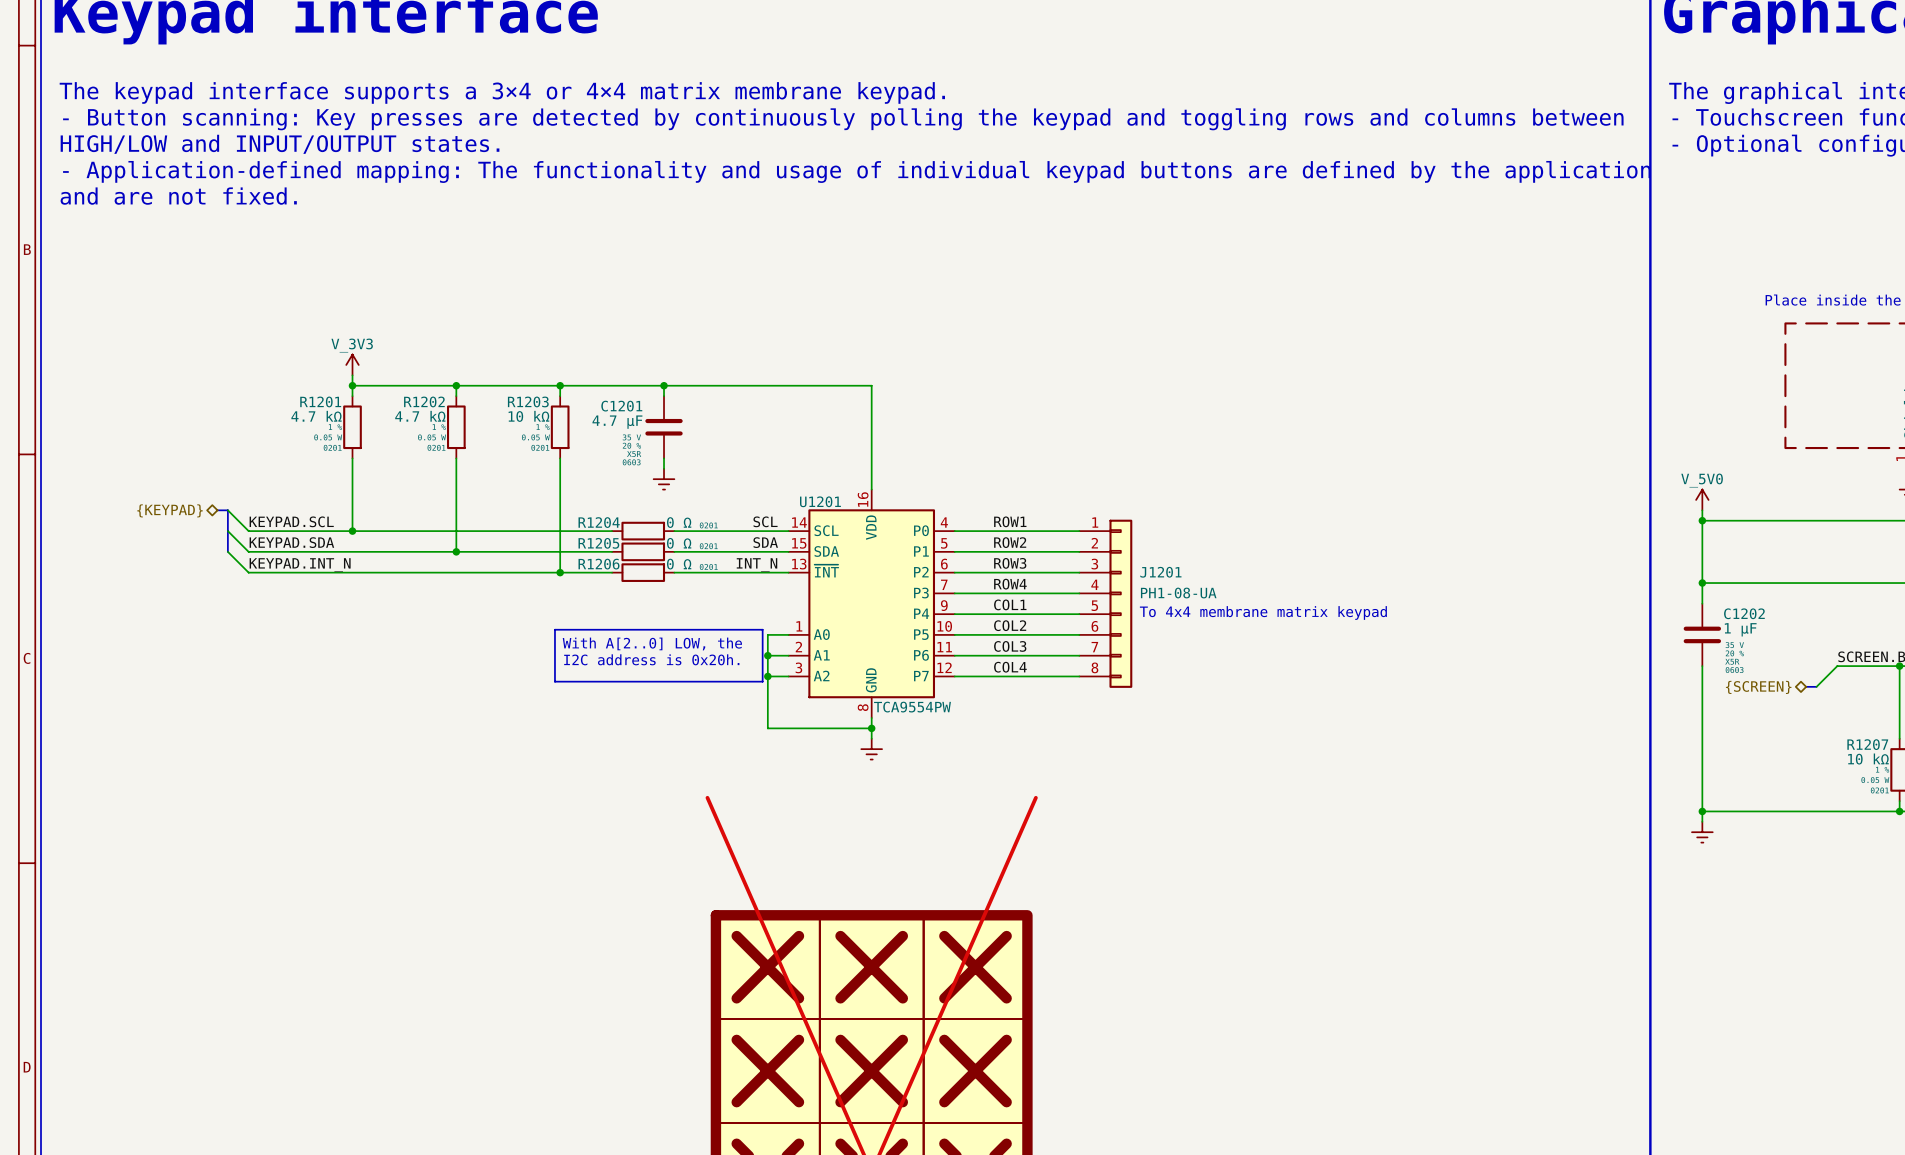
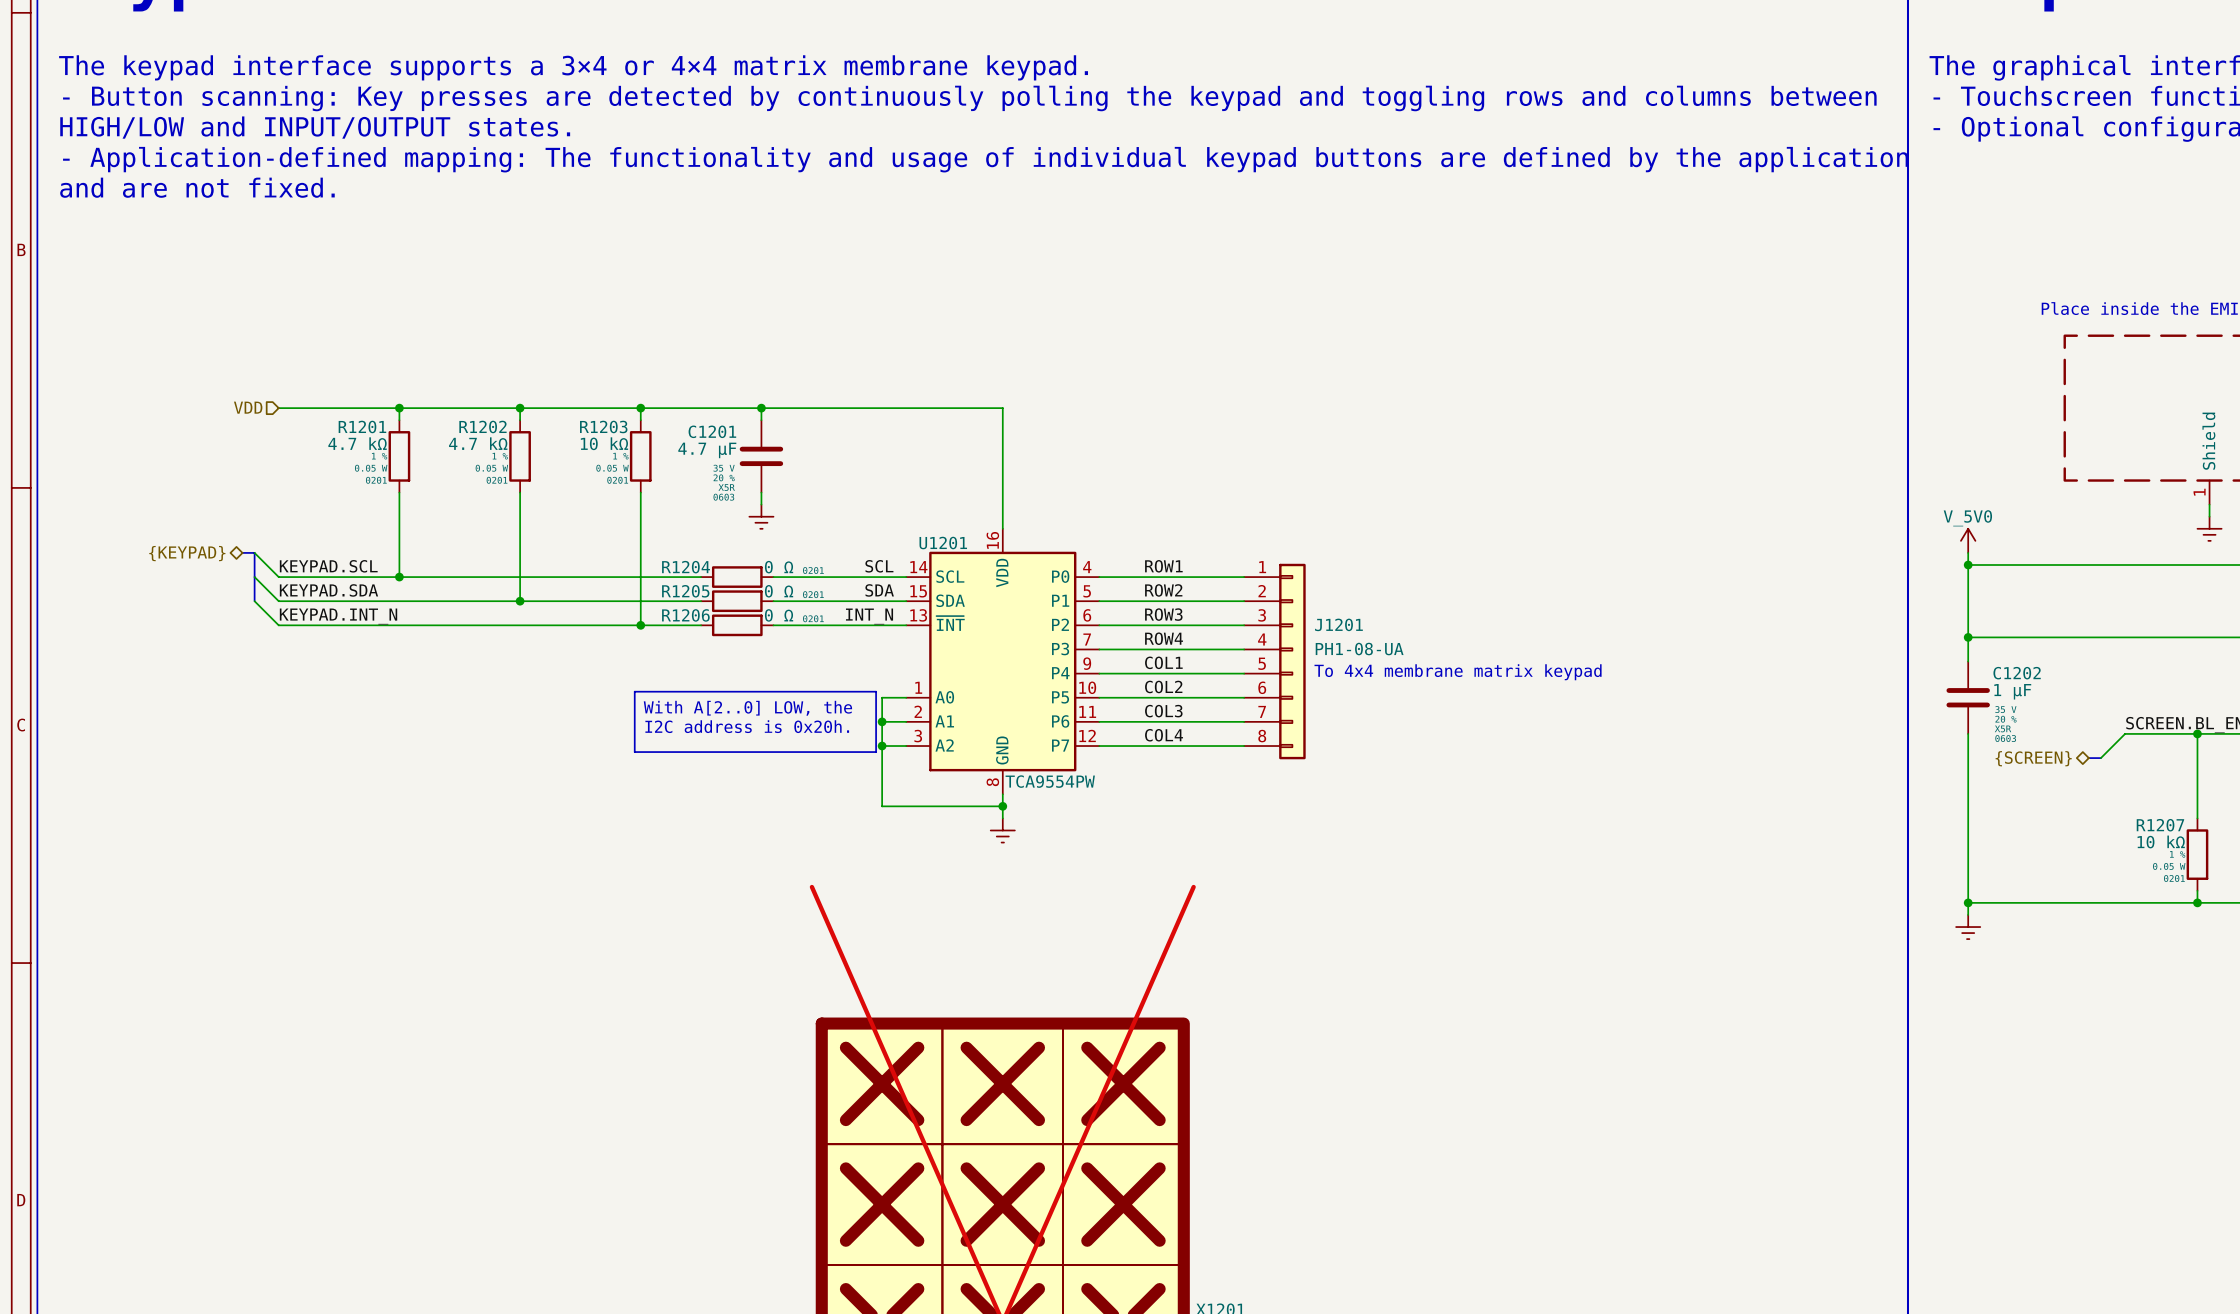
power symbol: V_3V3 (352, 364) -> none
wire: (352, 375) (352, 385) -> (278, 408) (399, 408)
hierarchical label: none -> VDD (248, 407)

